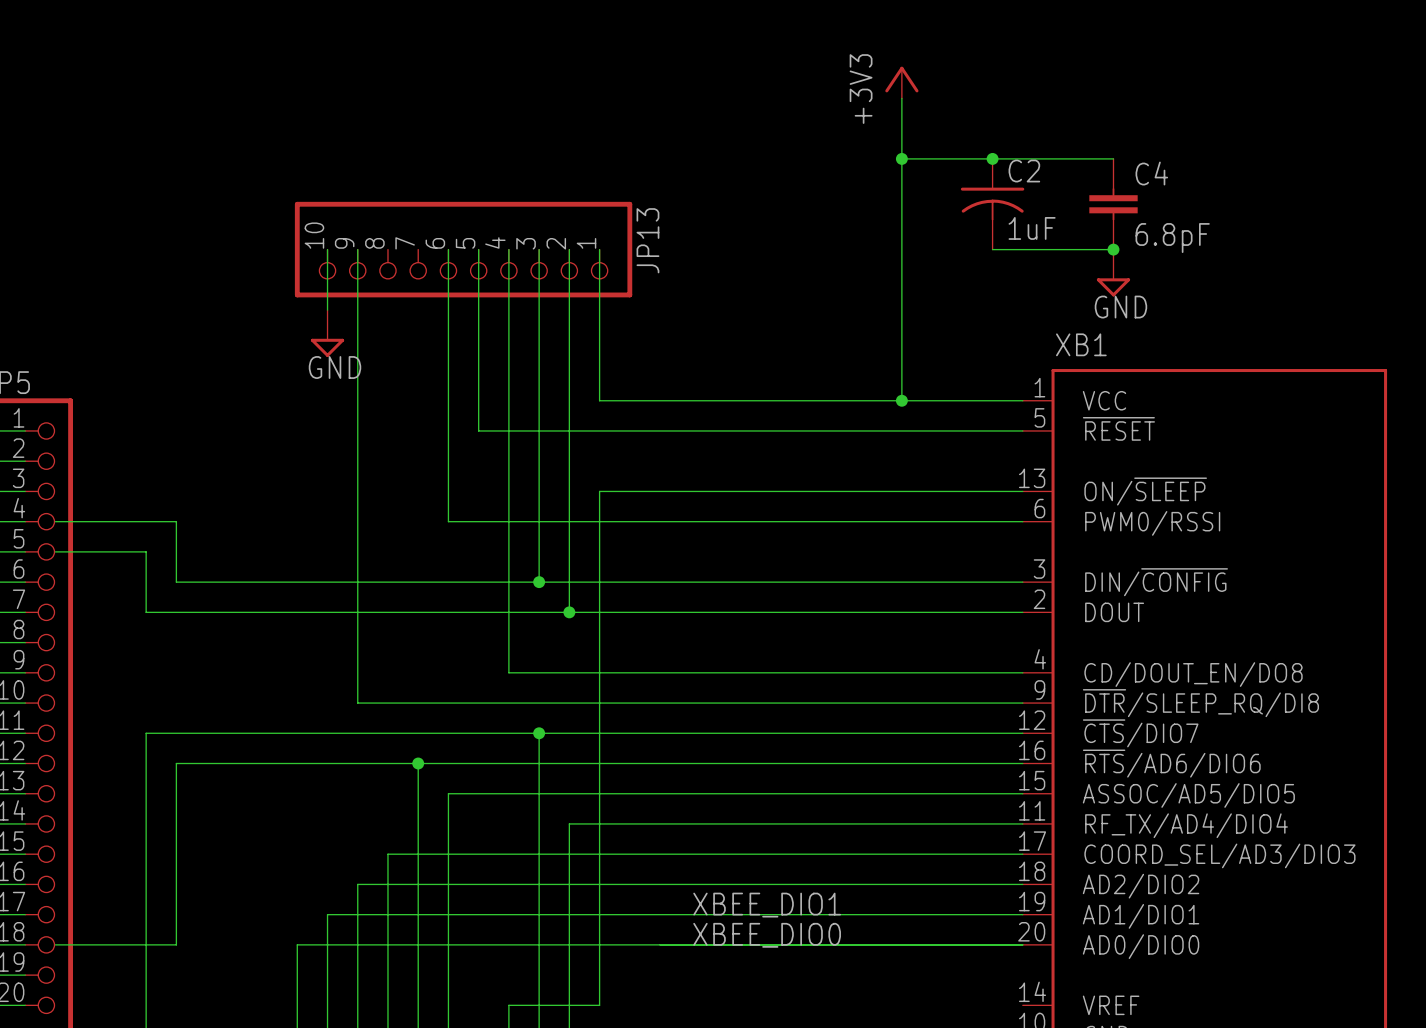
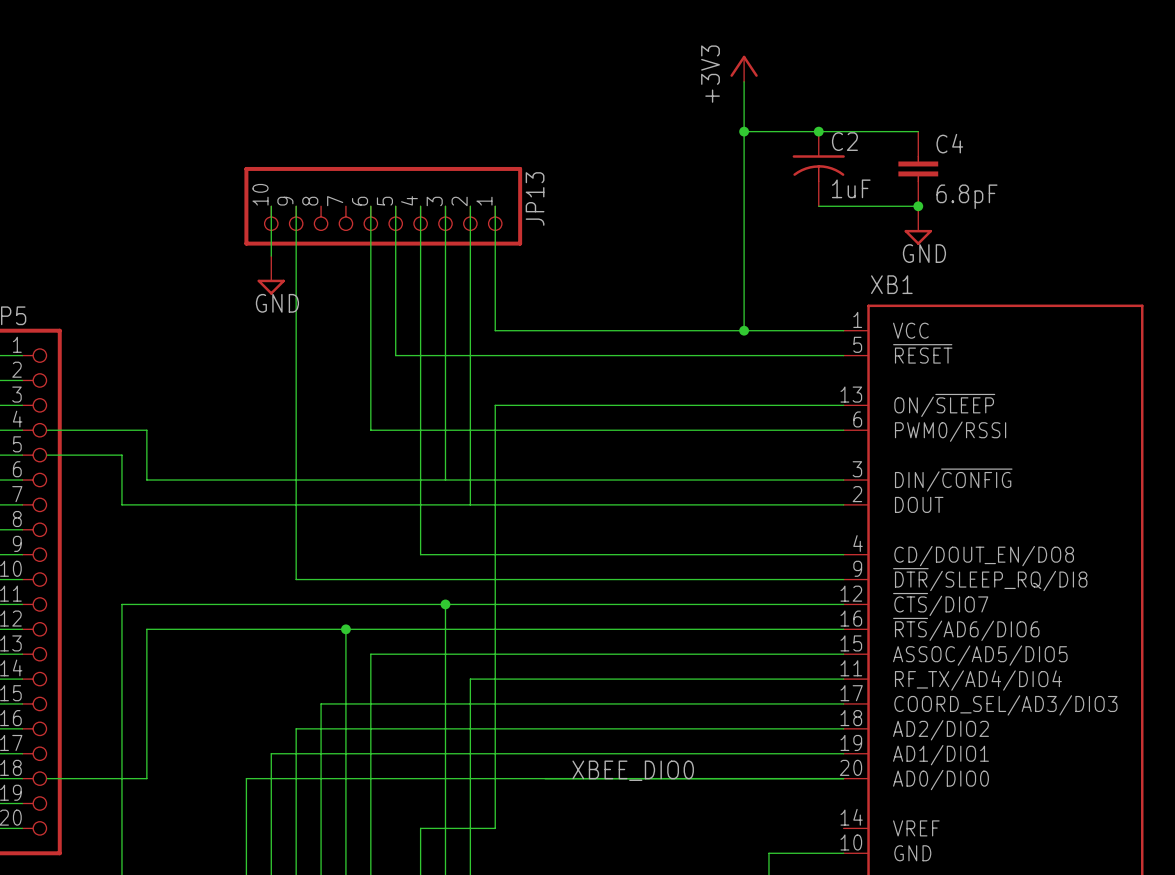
junction: (539, 582) -> none
junction: (569, 612) -> none
label: XBEE_DIO1 (767, 905) -> none

